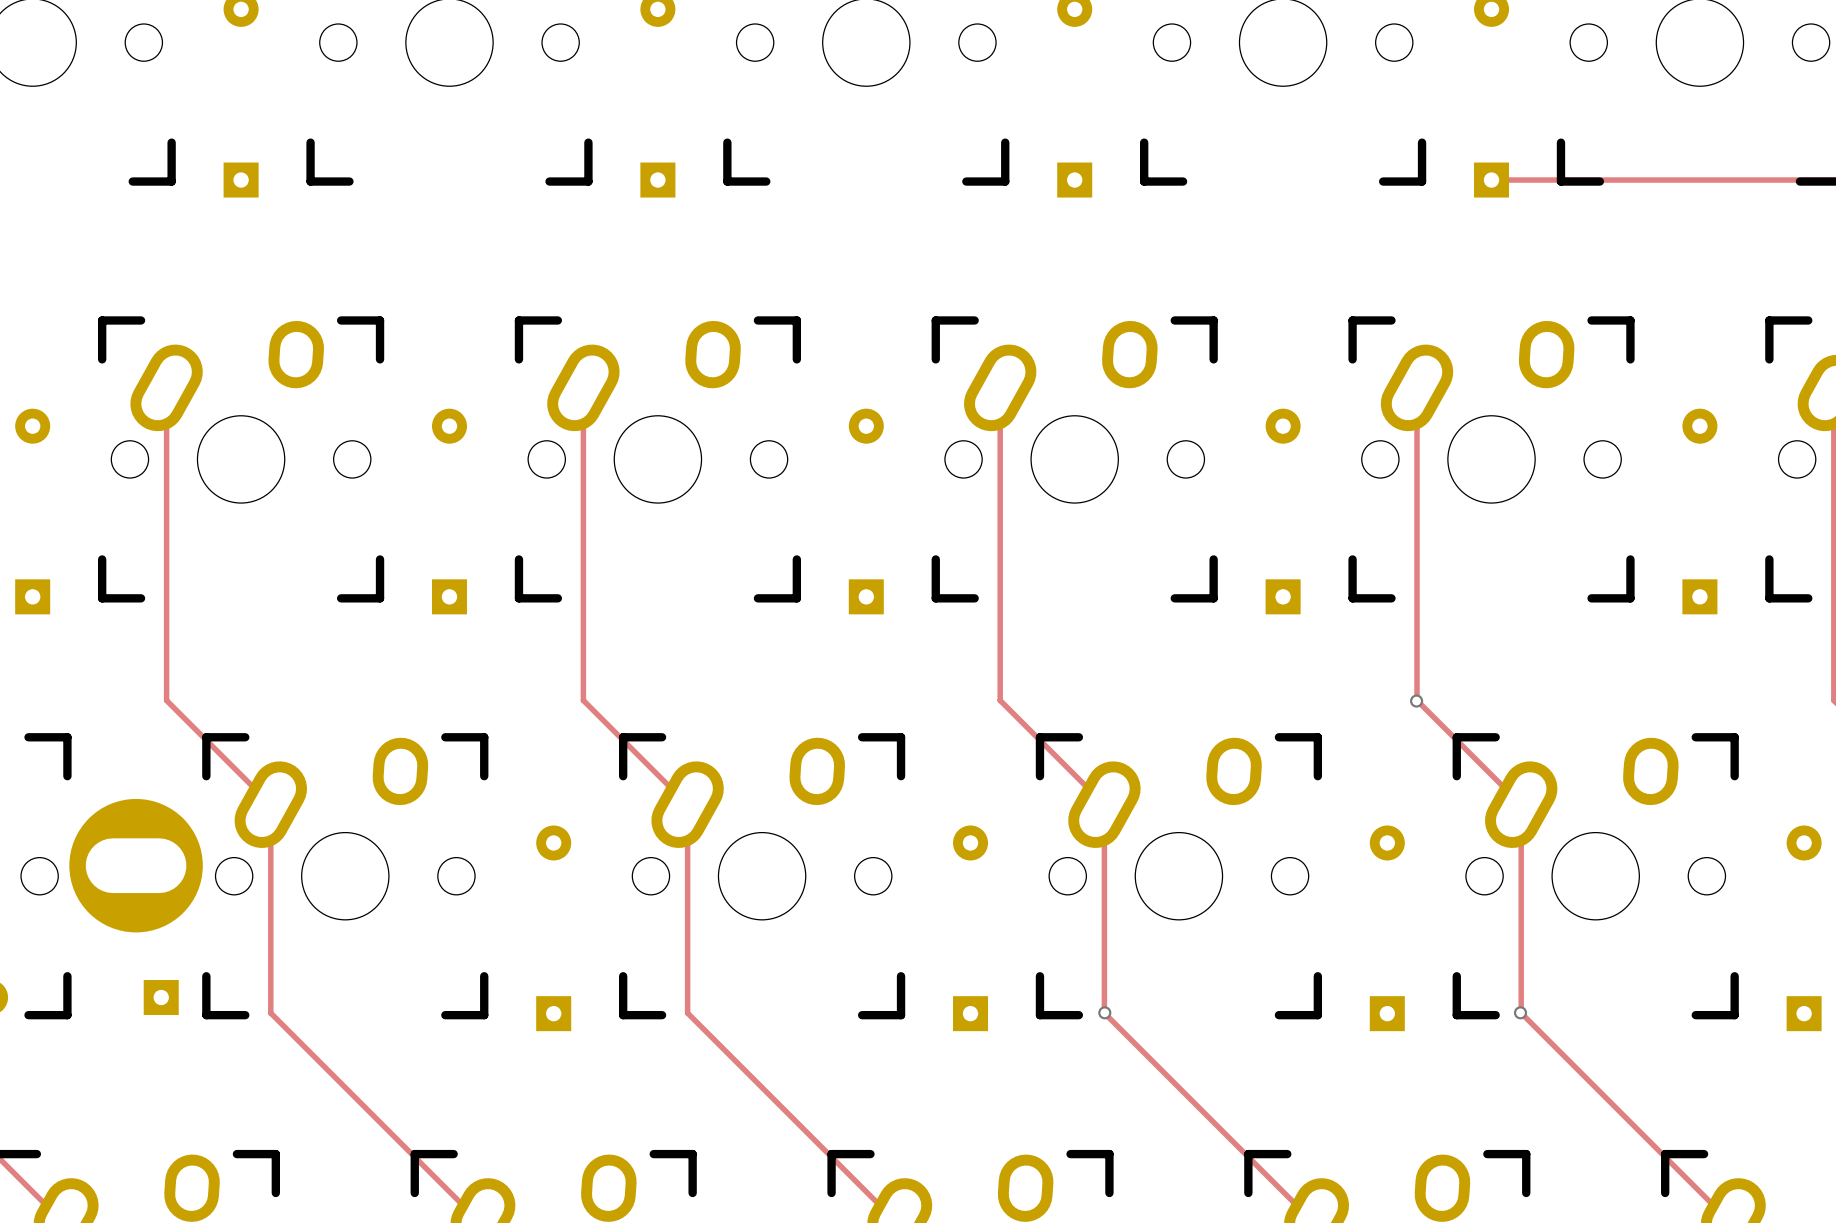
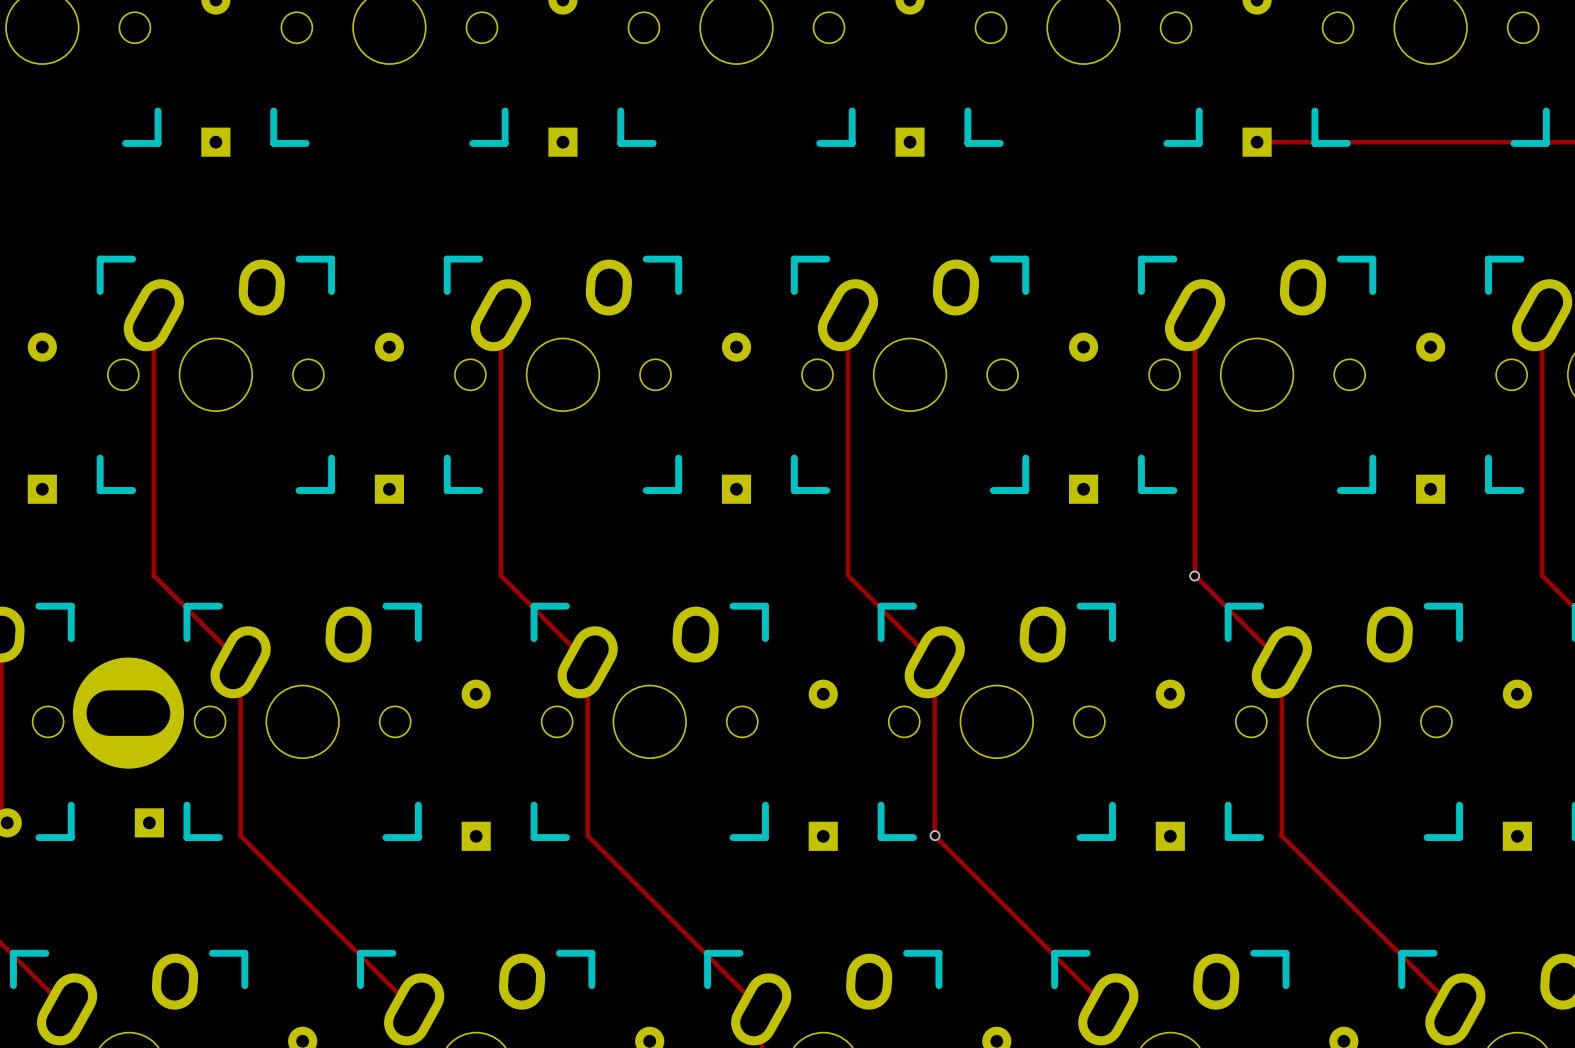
via: (1520, 1012) -> none

